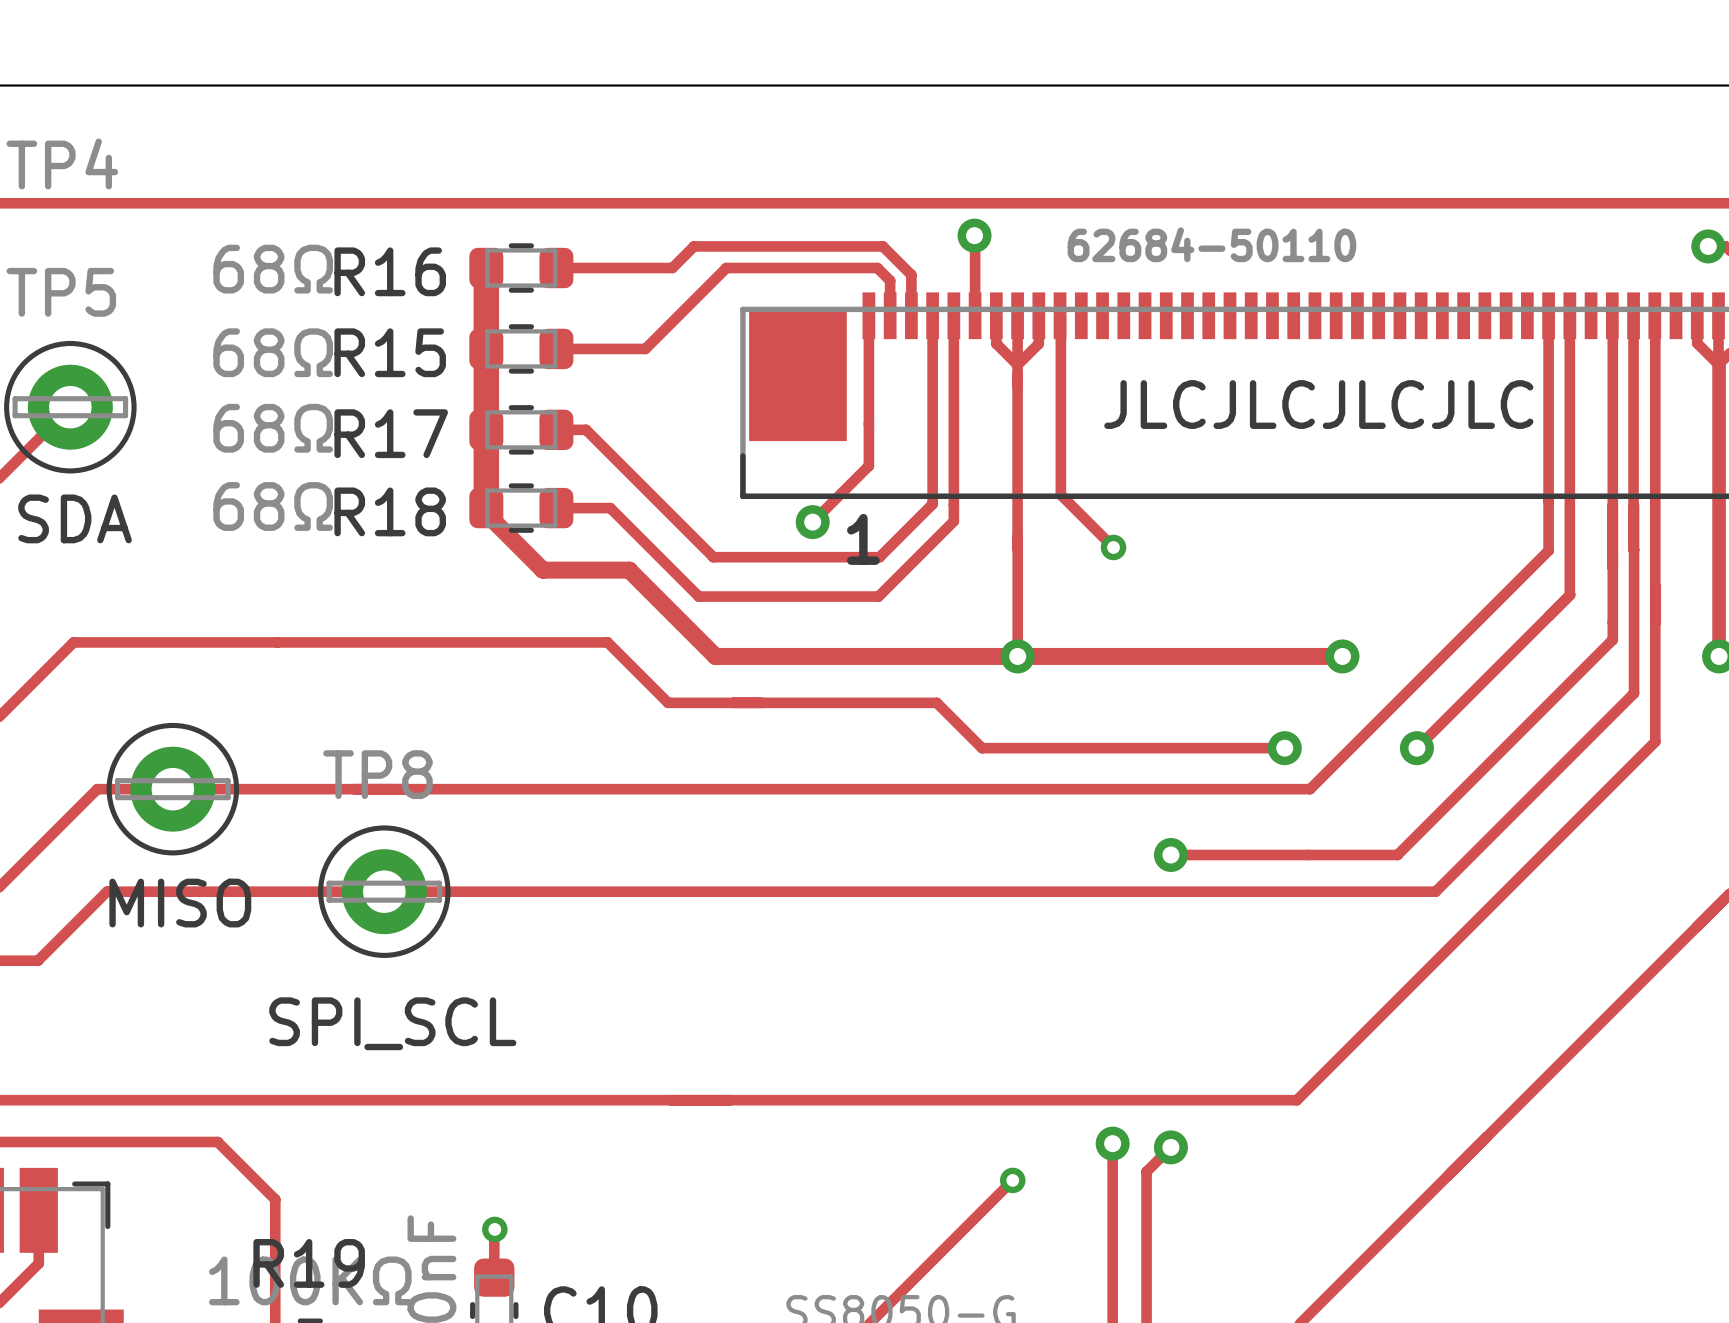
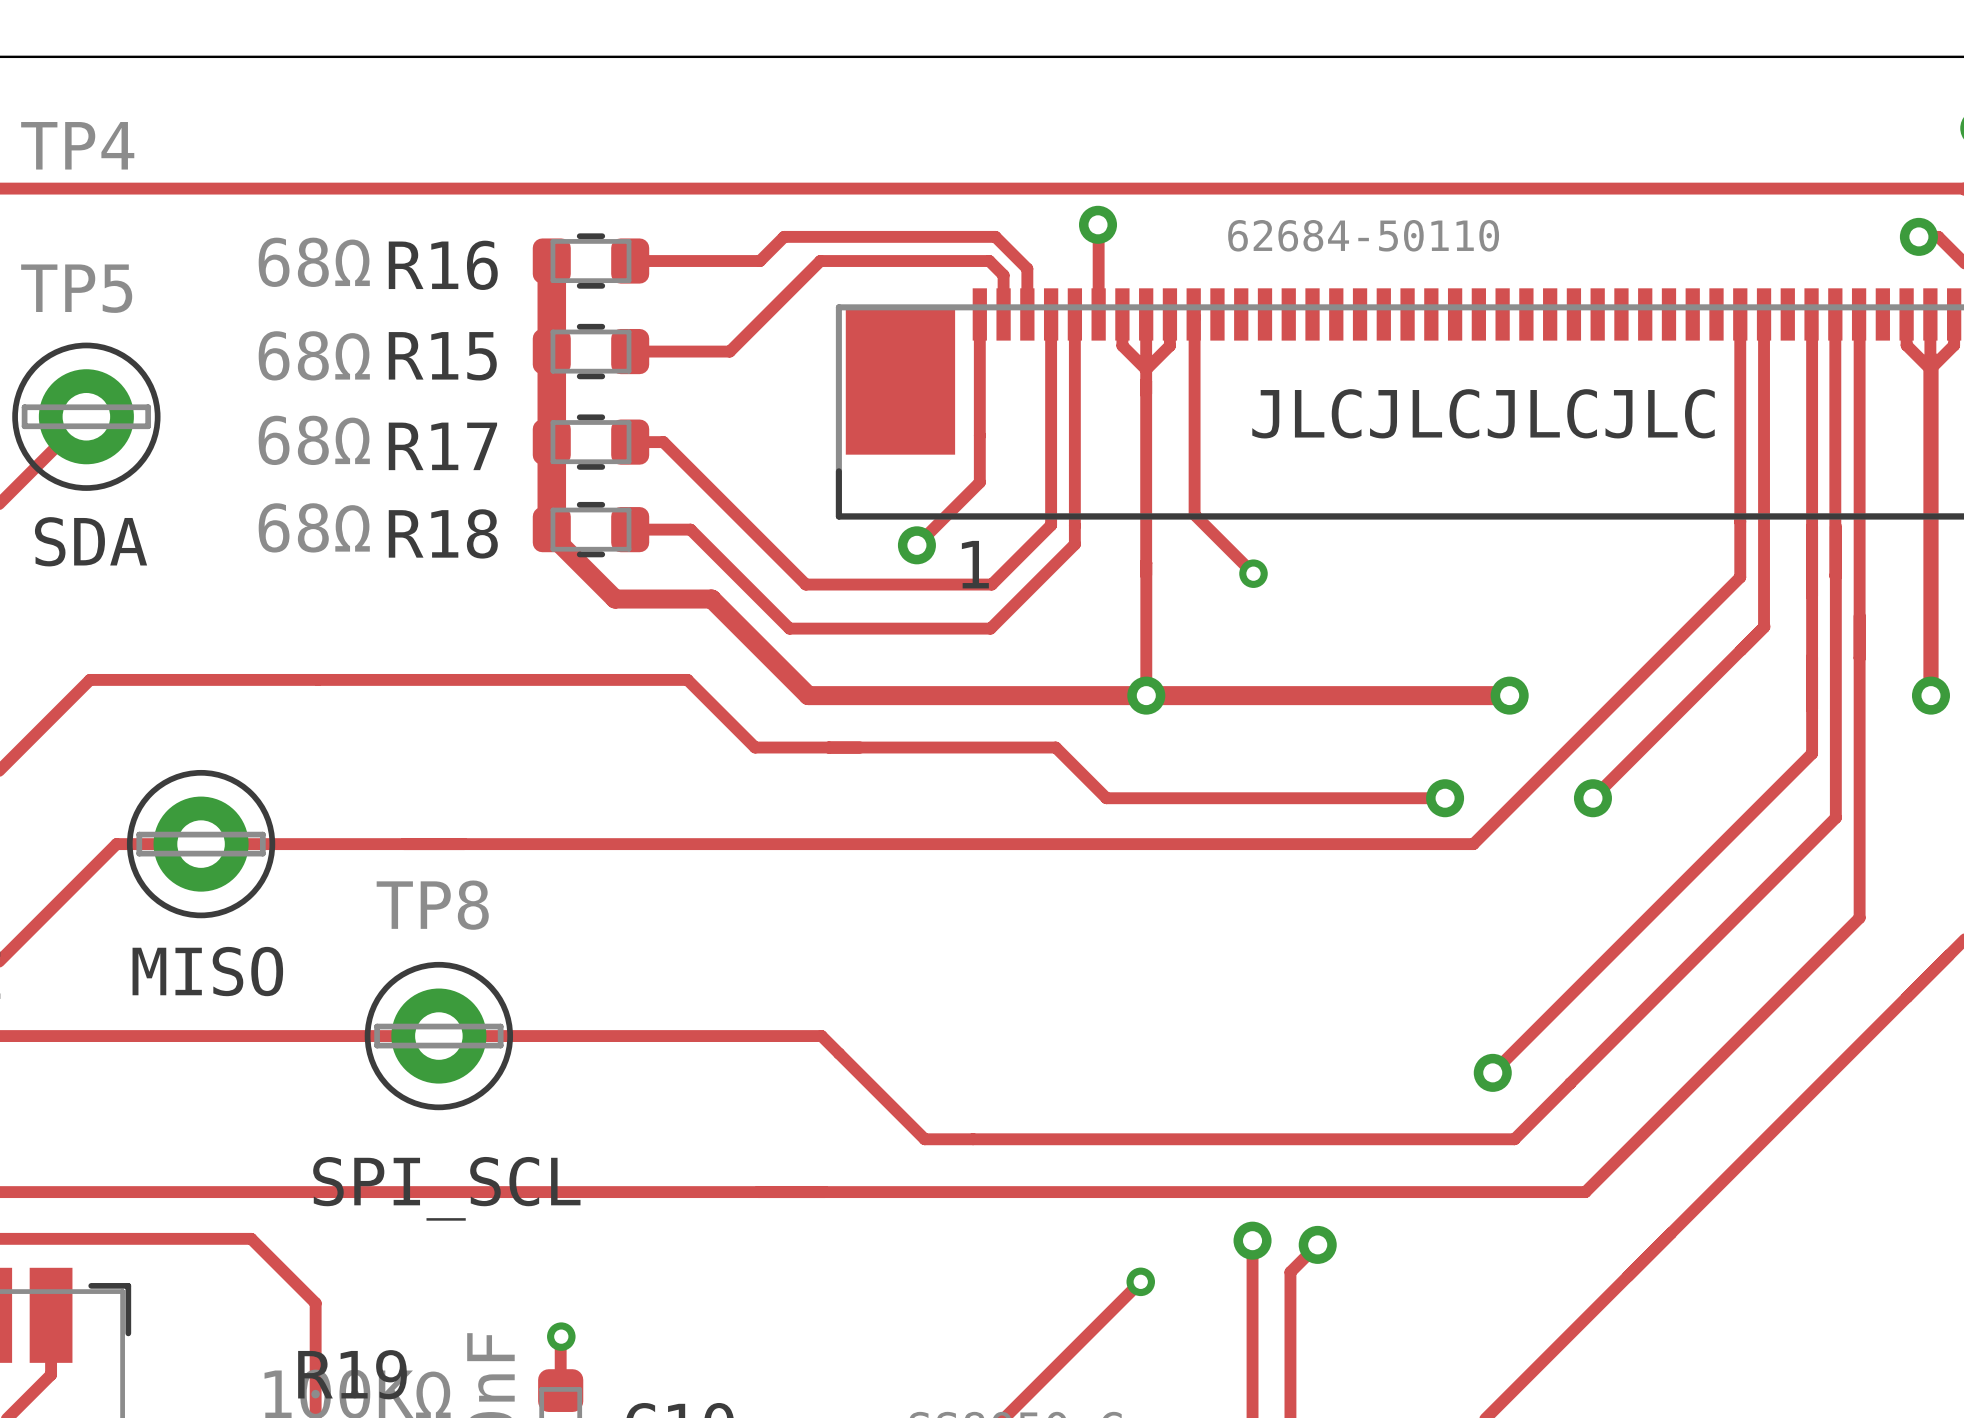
track: (1612, 639) (1397, 854) (1170, 854) -> (1812, 676) (1812, 753) (1492, 1072)
track: (1634, 693) (1435, 891) (107, 891) (37, 960) -> (1835, 736) (1835, 817) (1514, 1139) (924, 1139) (821, 1036) (50, 1036)
track: (1655, 741) (1296, 1100) -> (1859, 791) (1859, 917) (1585, 1192) (1458, 1192)
via position: (1170, 854) -> (1492, 1072)
TP8 position: (384, 891) -> (438, 1036)

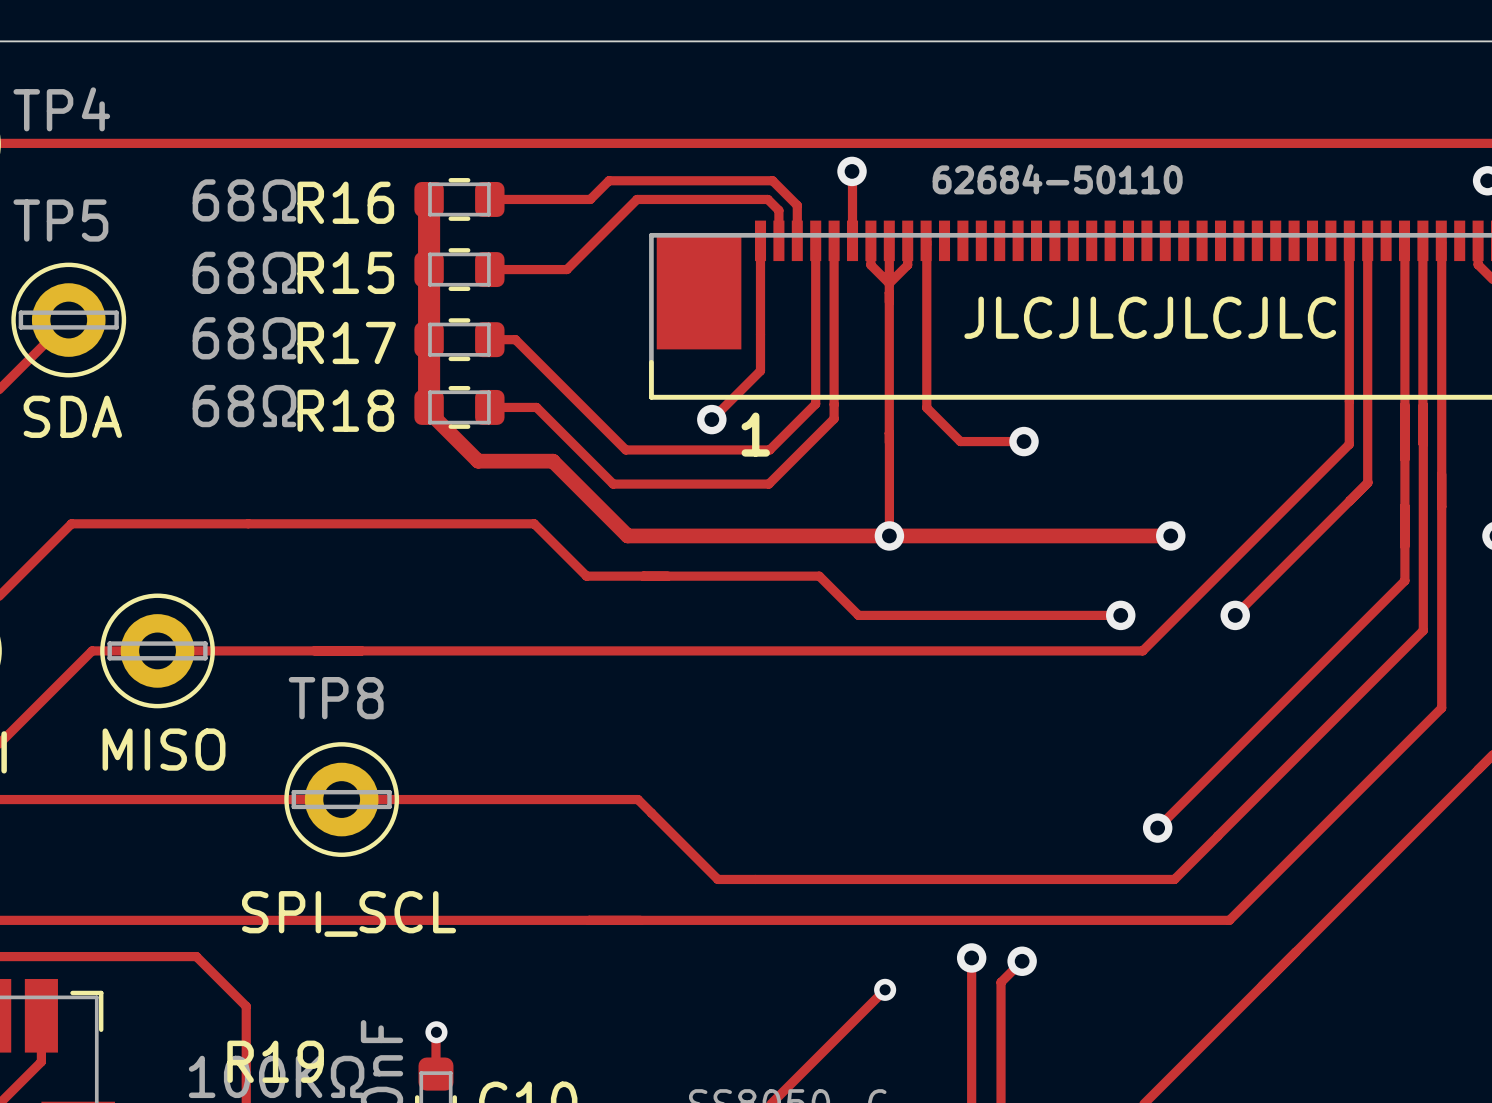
track: (1194, 514) (1253, 573) -> (926, 395) (926, 407) (960, 441) (1024, 441)
via: (1253, 573) -> none
via: none -> (1024, 441)

